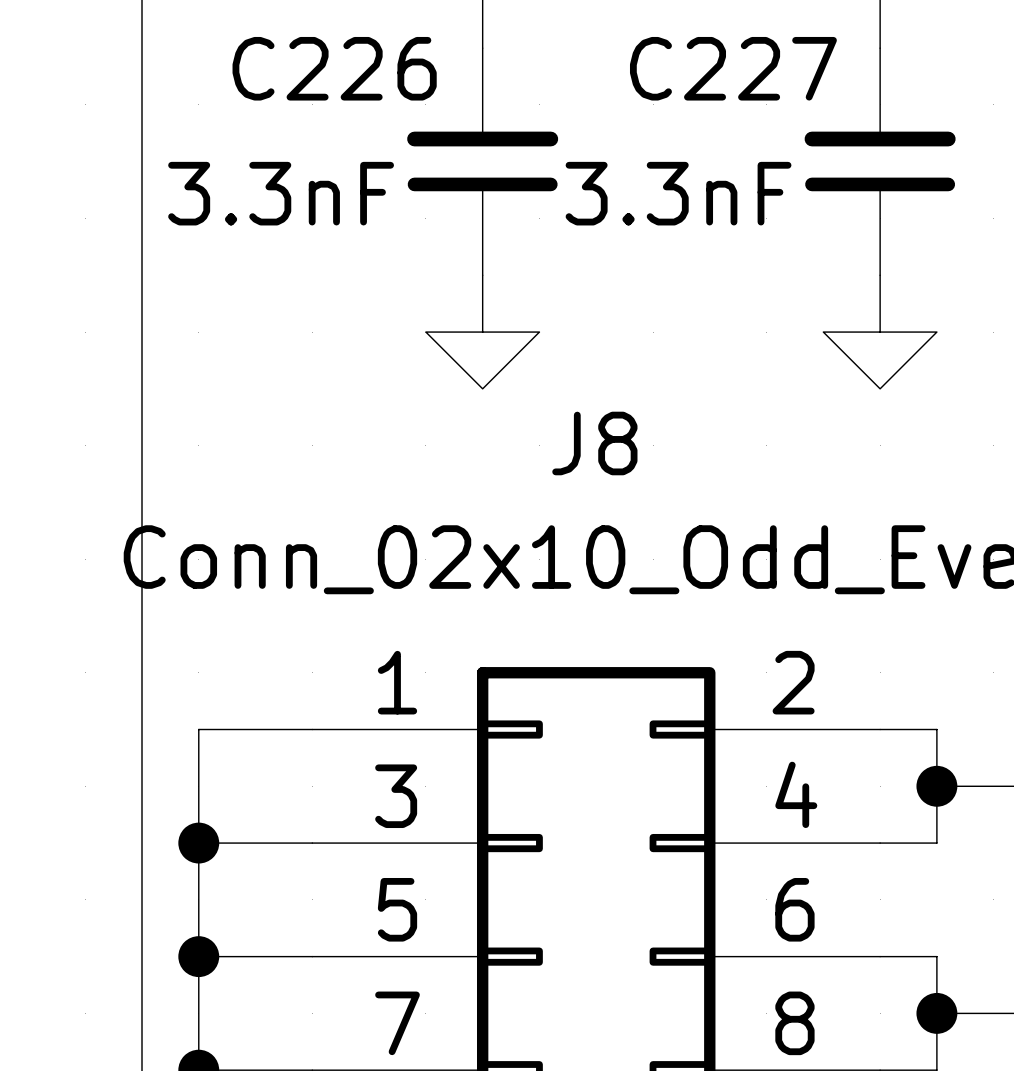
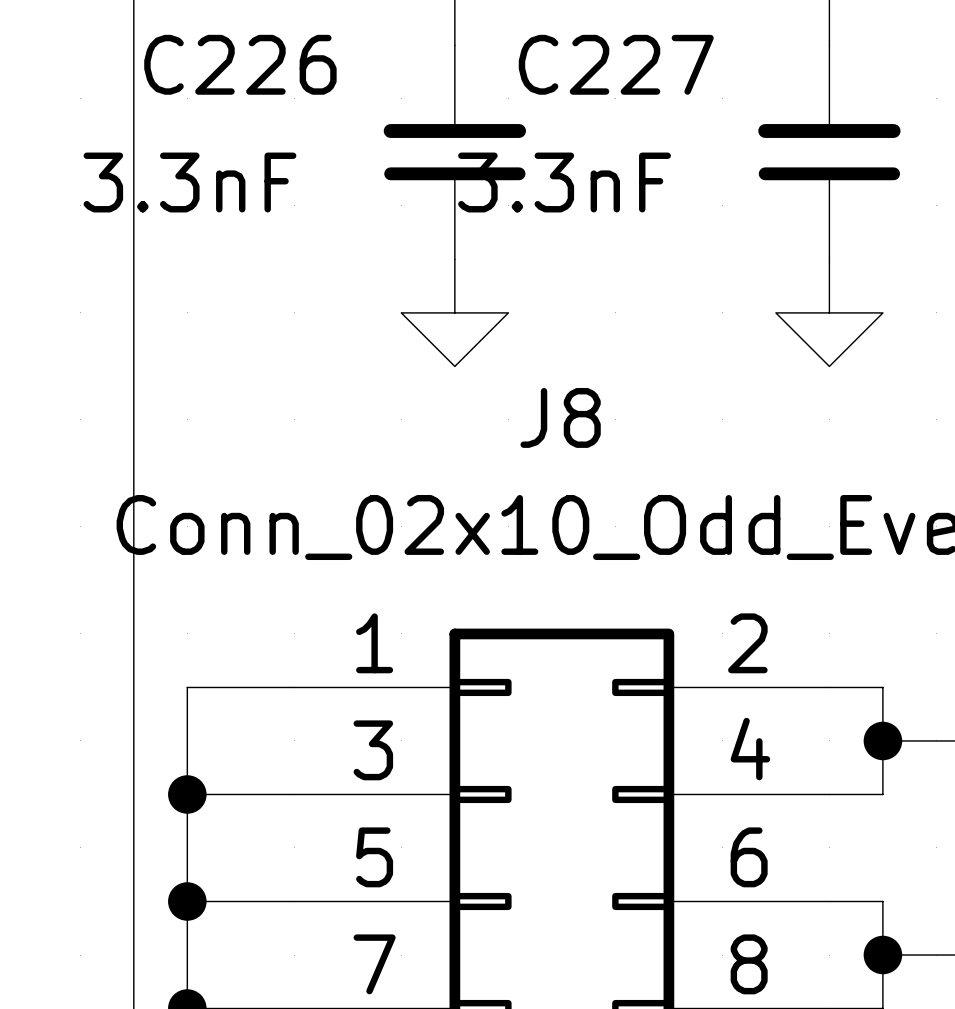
C226 name position: C226 (334, 68) -> C226 (240, 64)
C227 name position: C227 (733, 68) -> C227 (616, 64)
C226 value position: 3.3nF (281, 193) -> 3.3nF (189, 182)
C227 value position: 3.3nF (678, 193) -> 3.3nF (564, 182)

